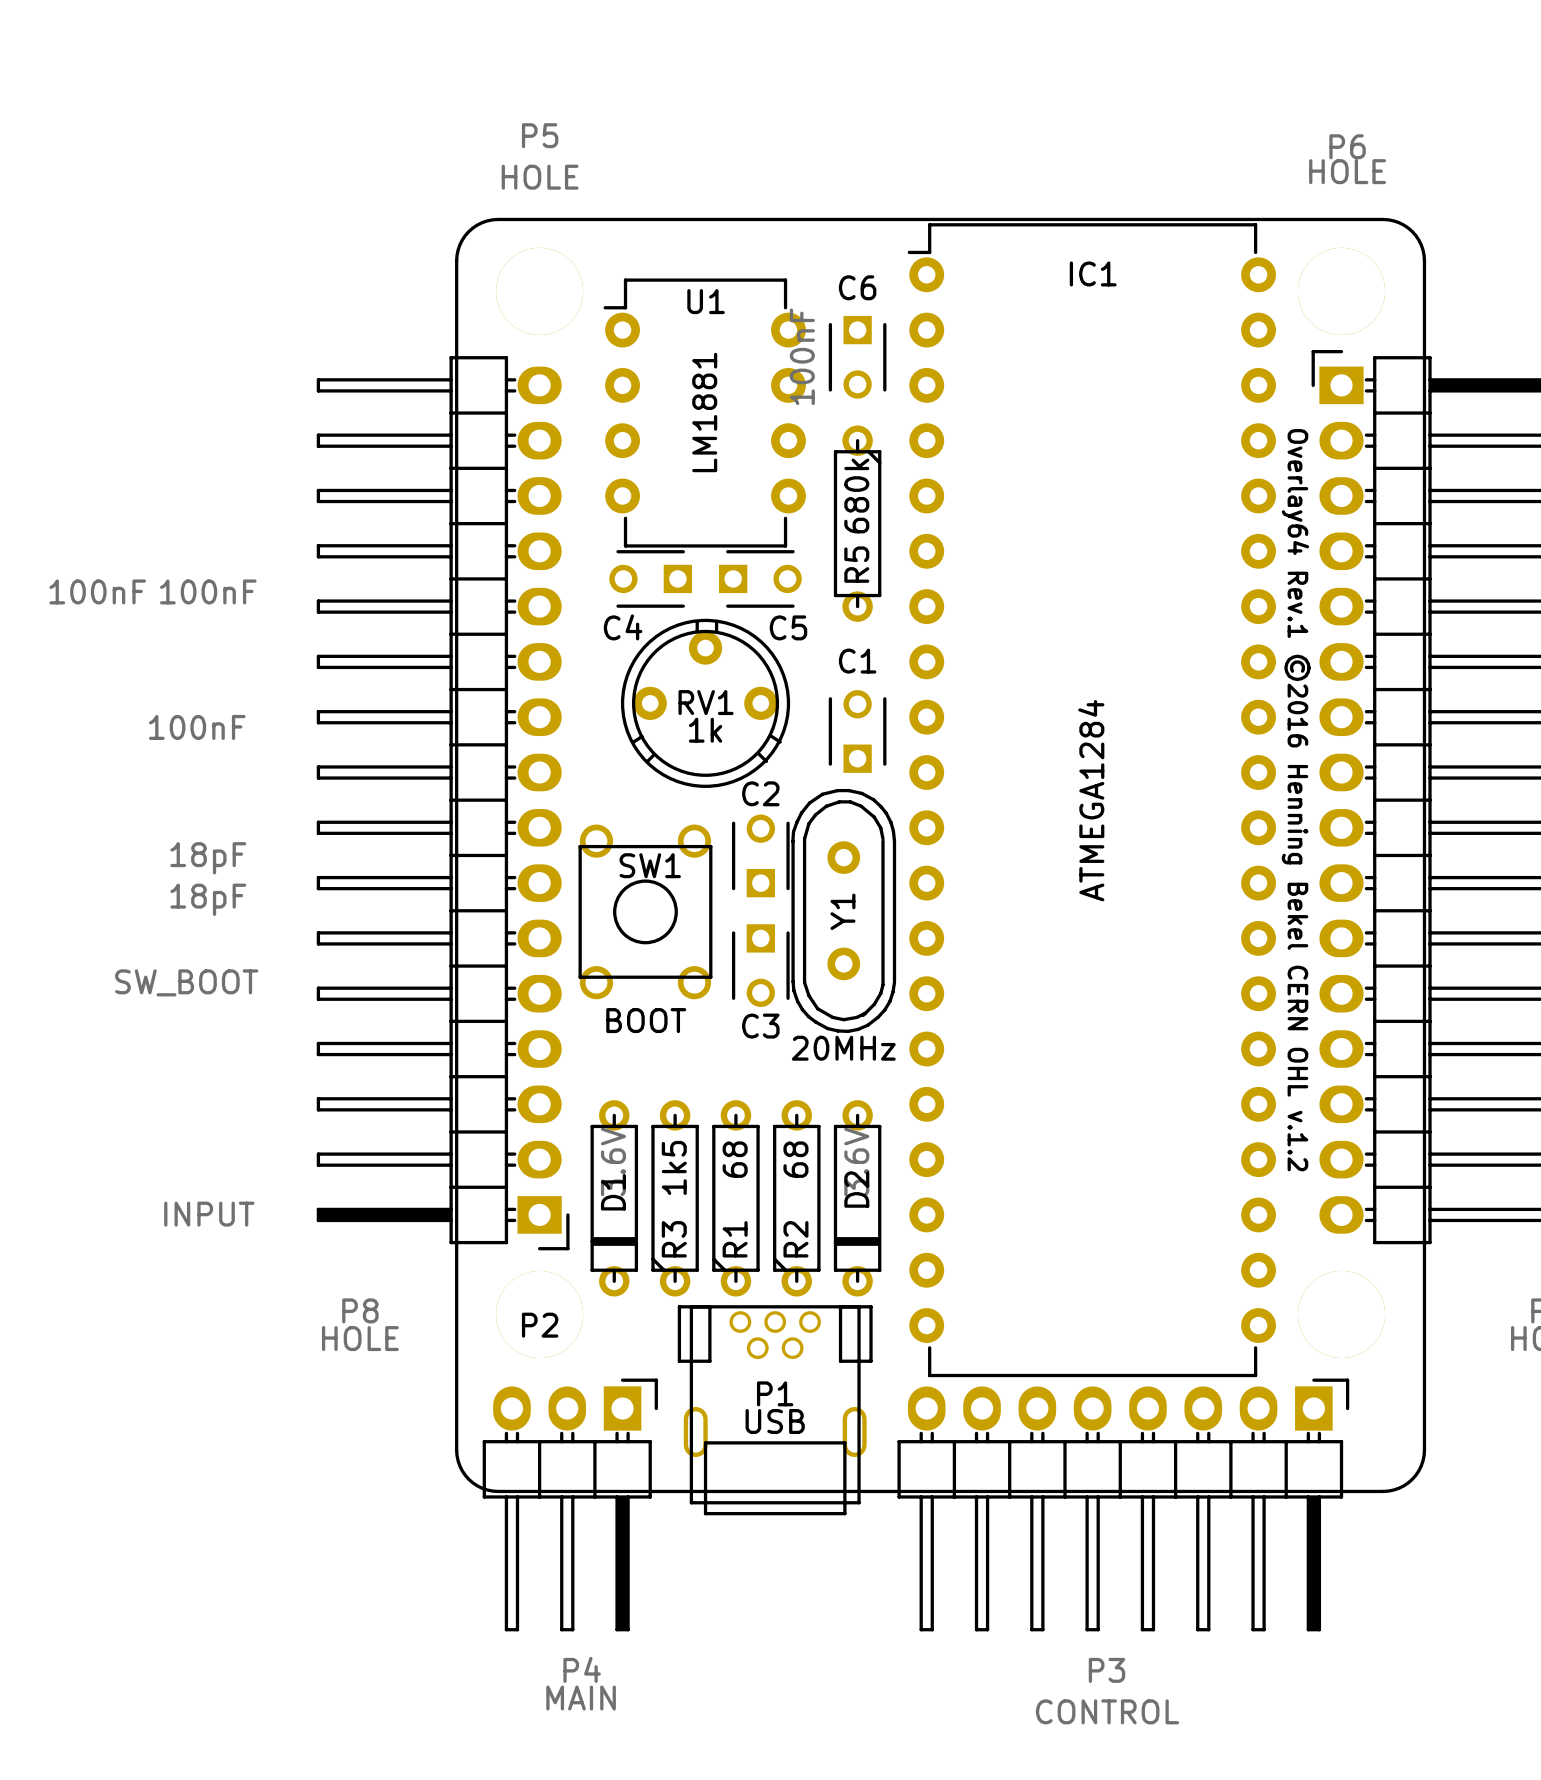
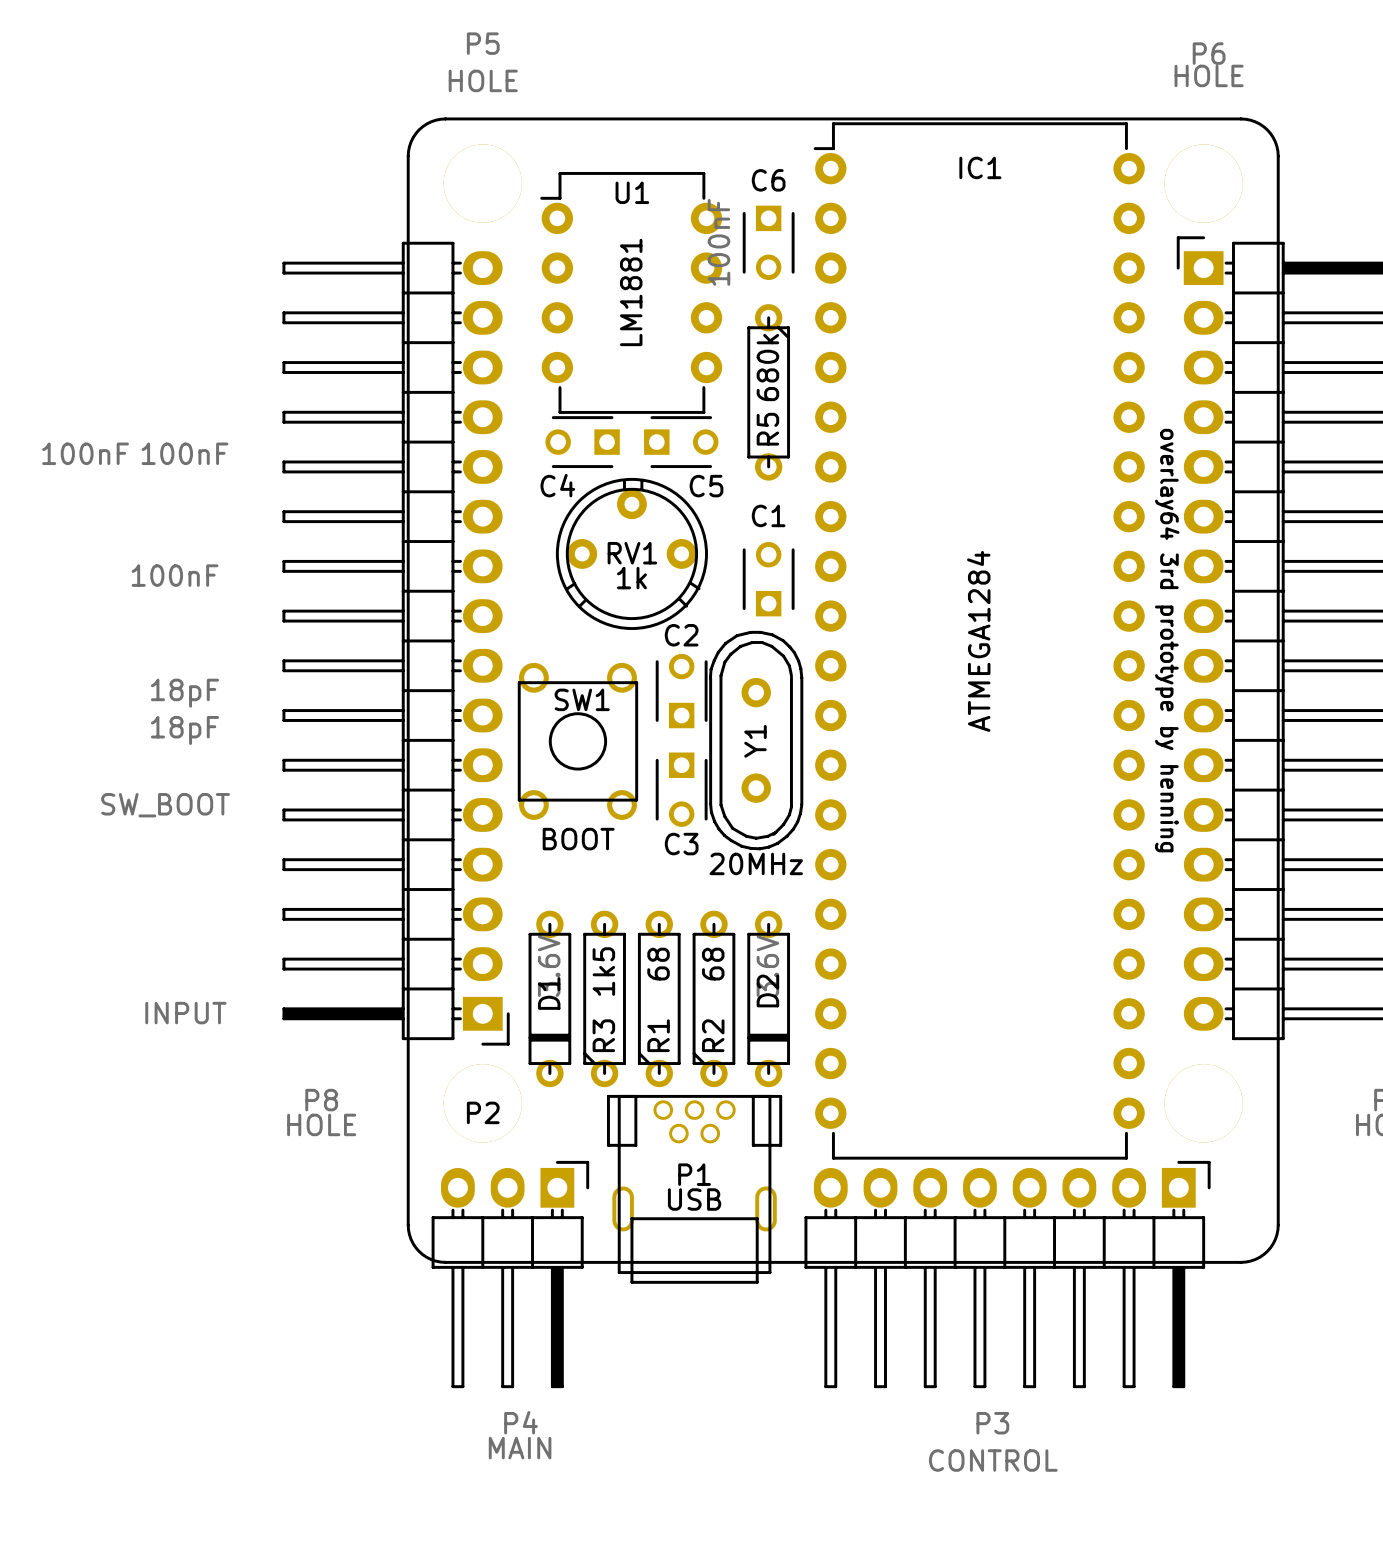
text: Overlay64 Rev.1 ©2016 Henning Bekel CERN OHL v.1.2 (1296, 800) -> overlay64 3rd prototype by henning (1167, 640)

